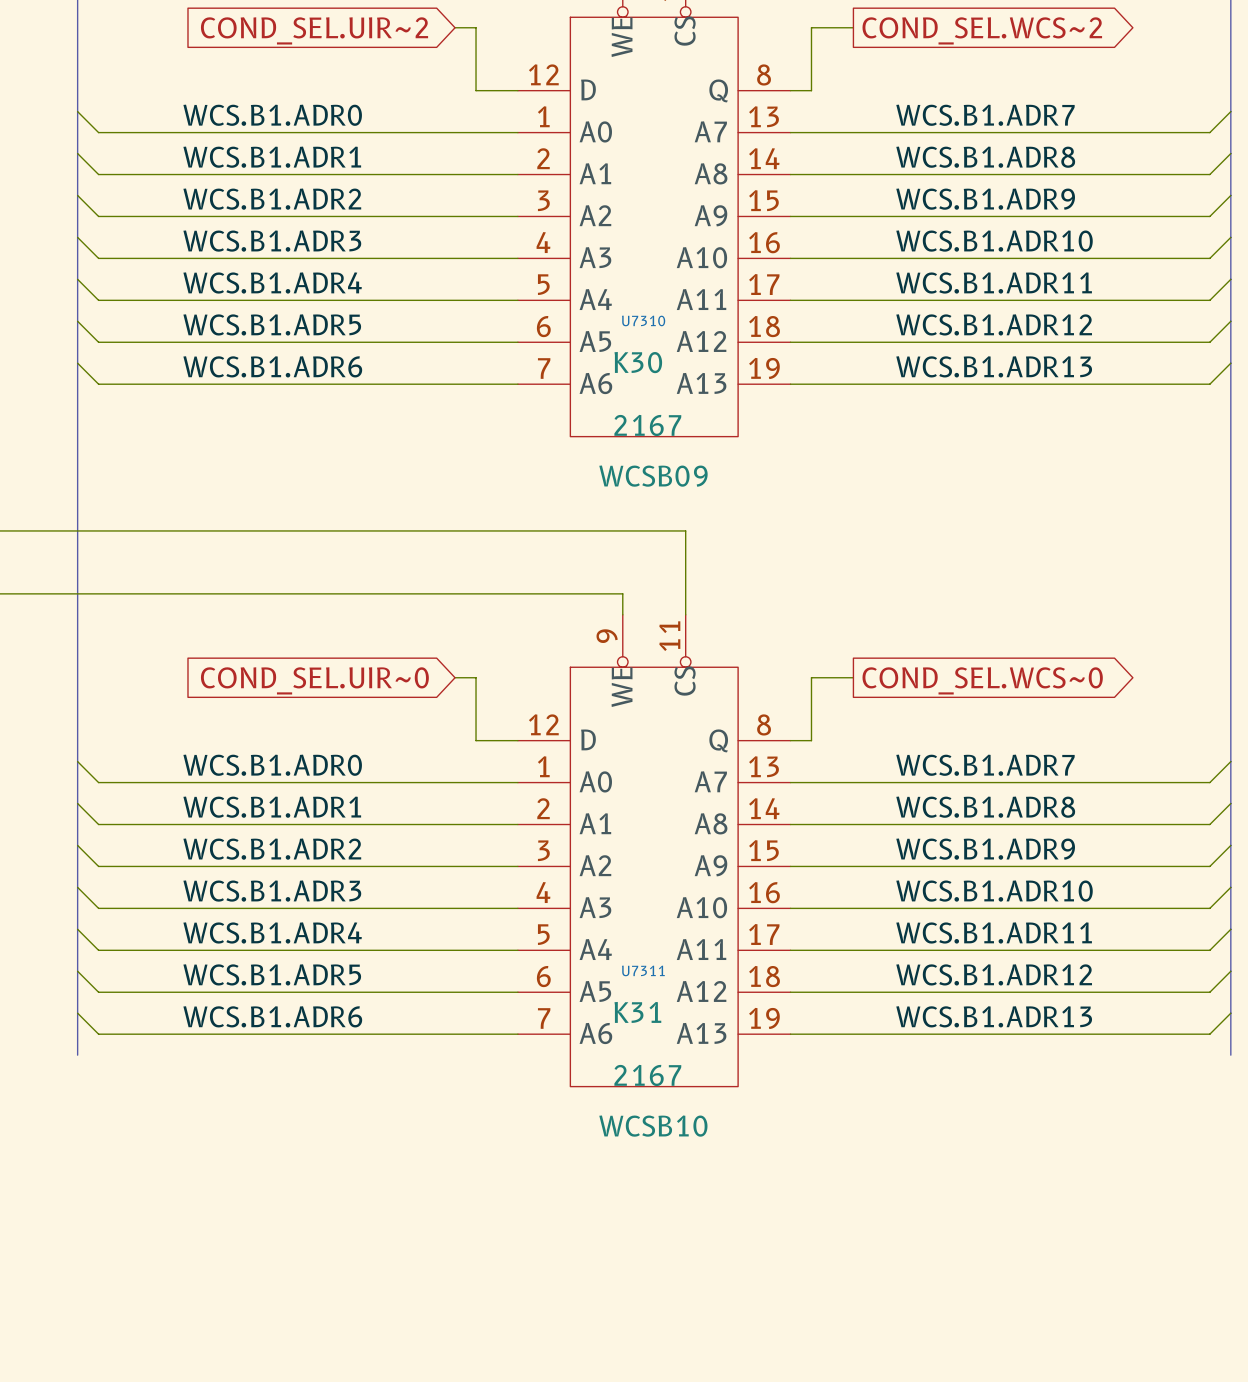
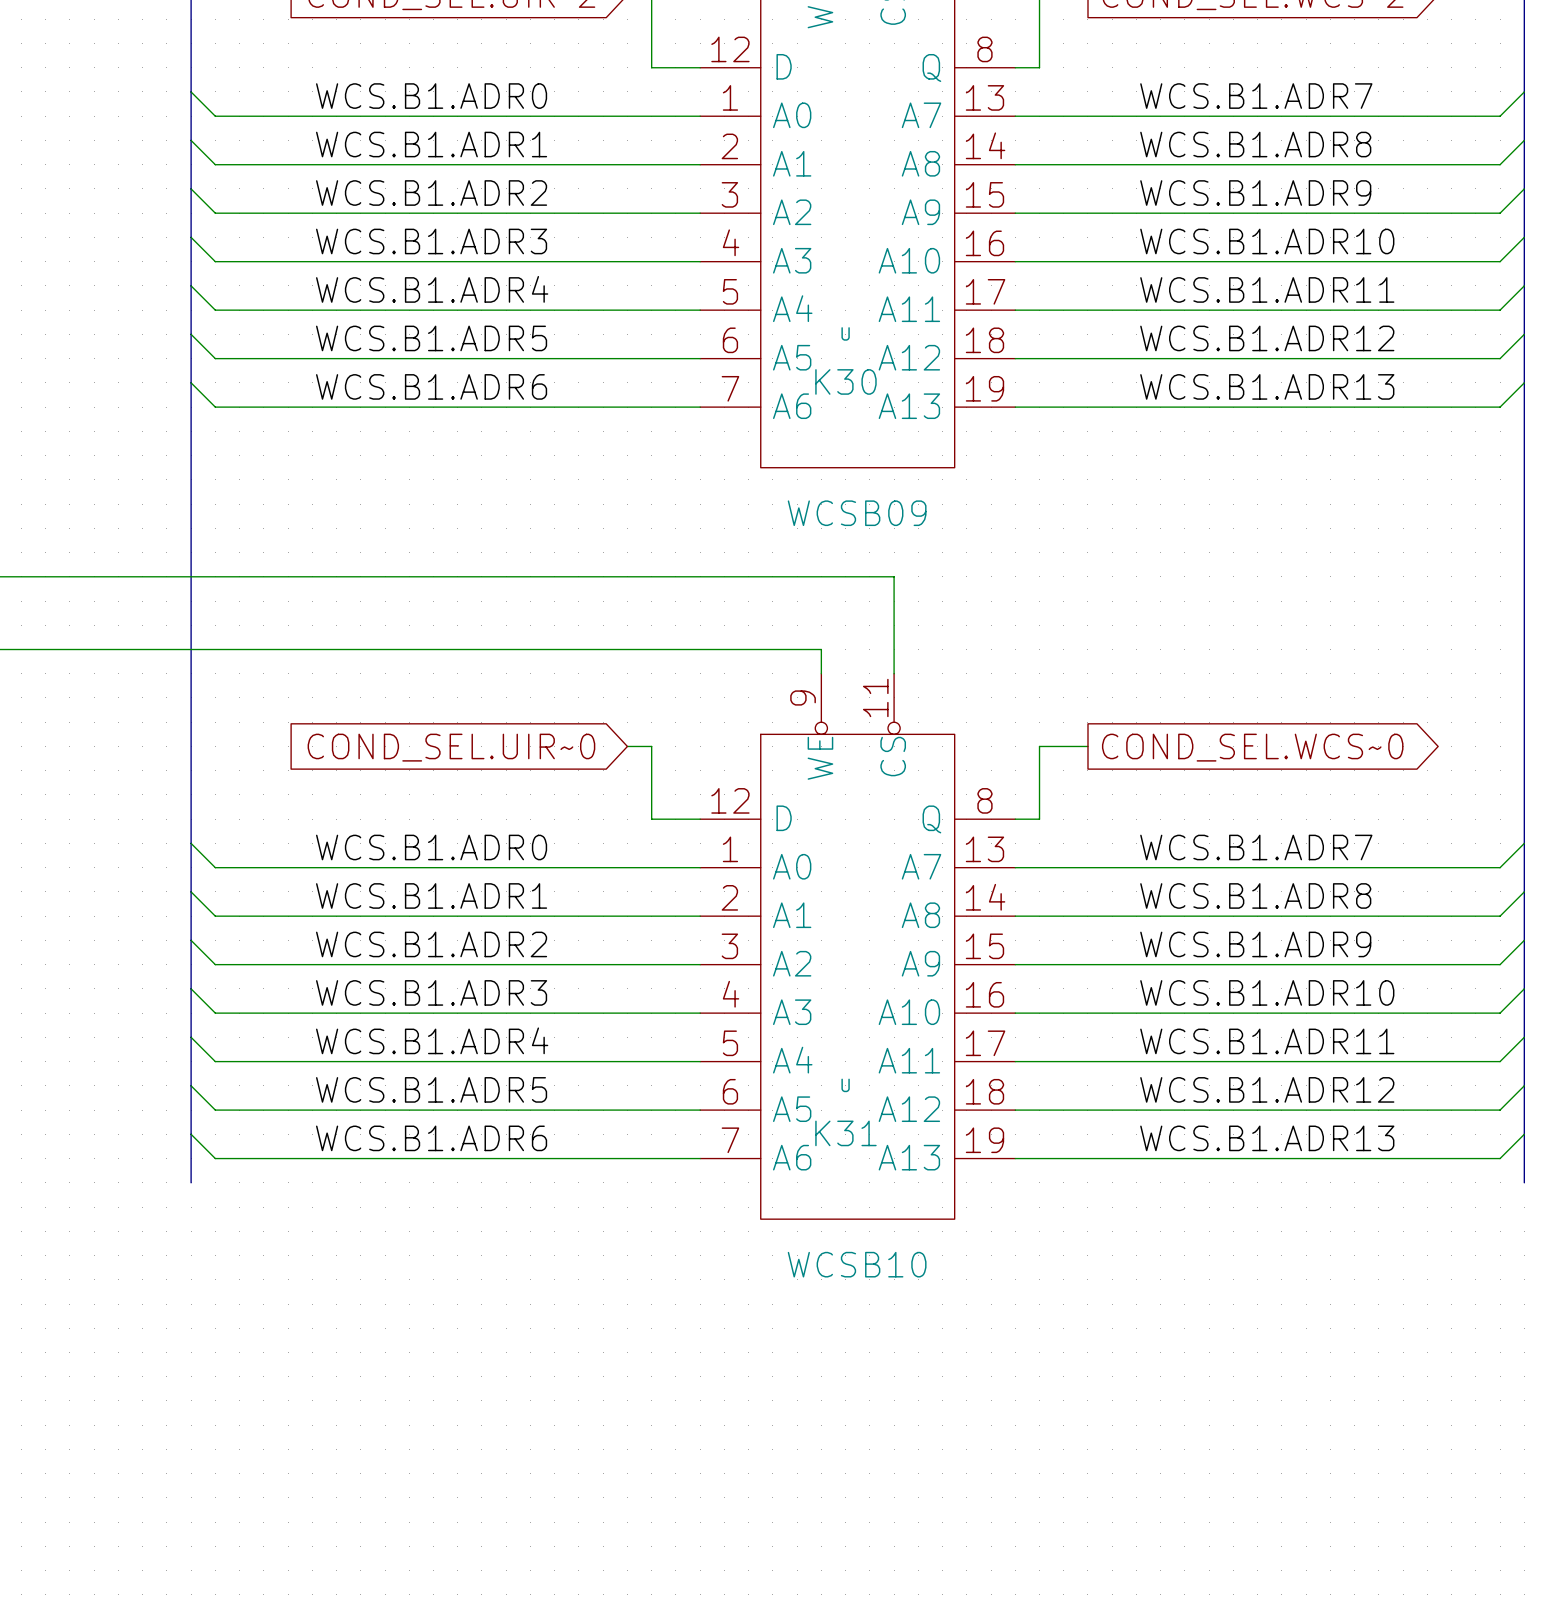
U7310 name: U7310 (643, 320) -> U (845, 333)
U7310 value: 2167 (647, 425) -> none
U7311 name: U7311 (643, 970) -> U (845, 1085)
U7311 value: 2167 (647, 1075) -> none

